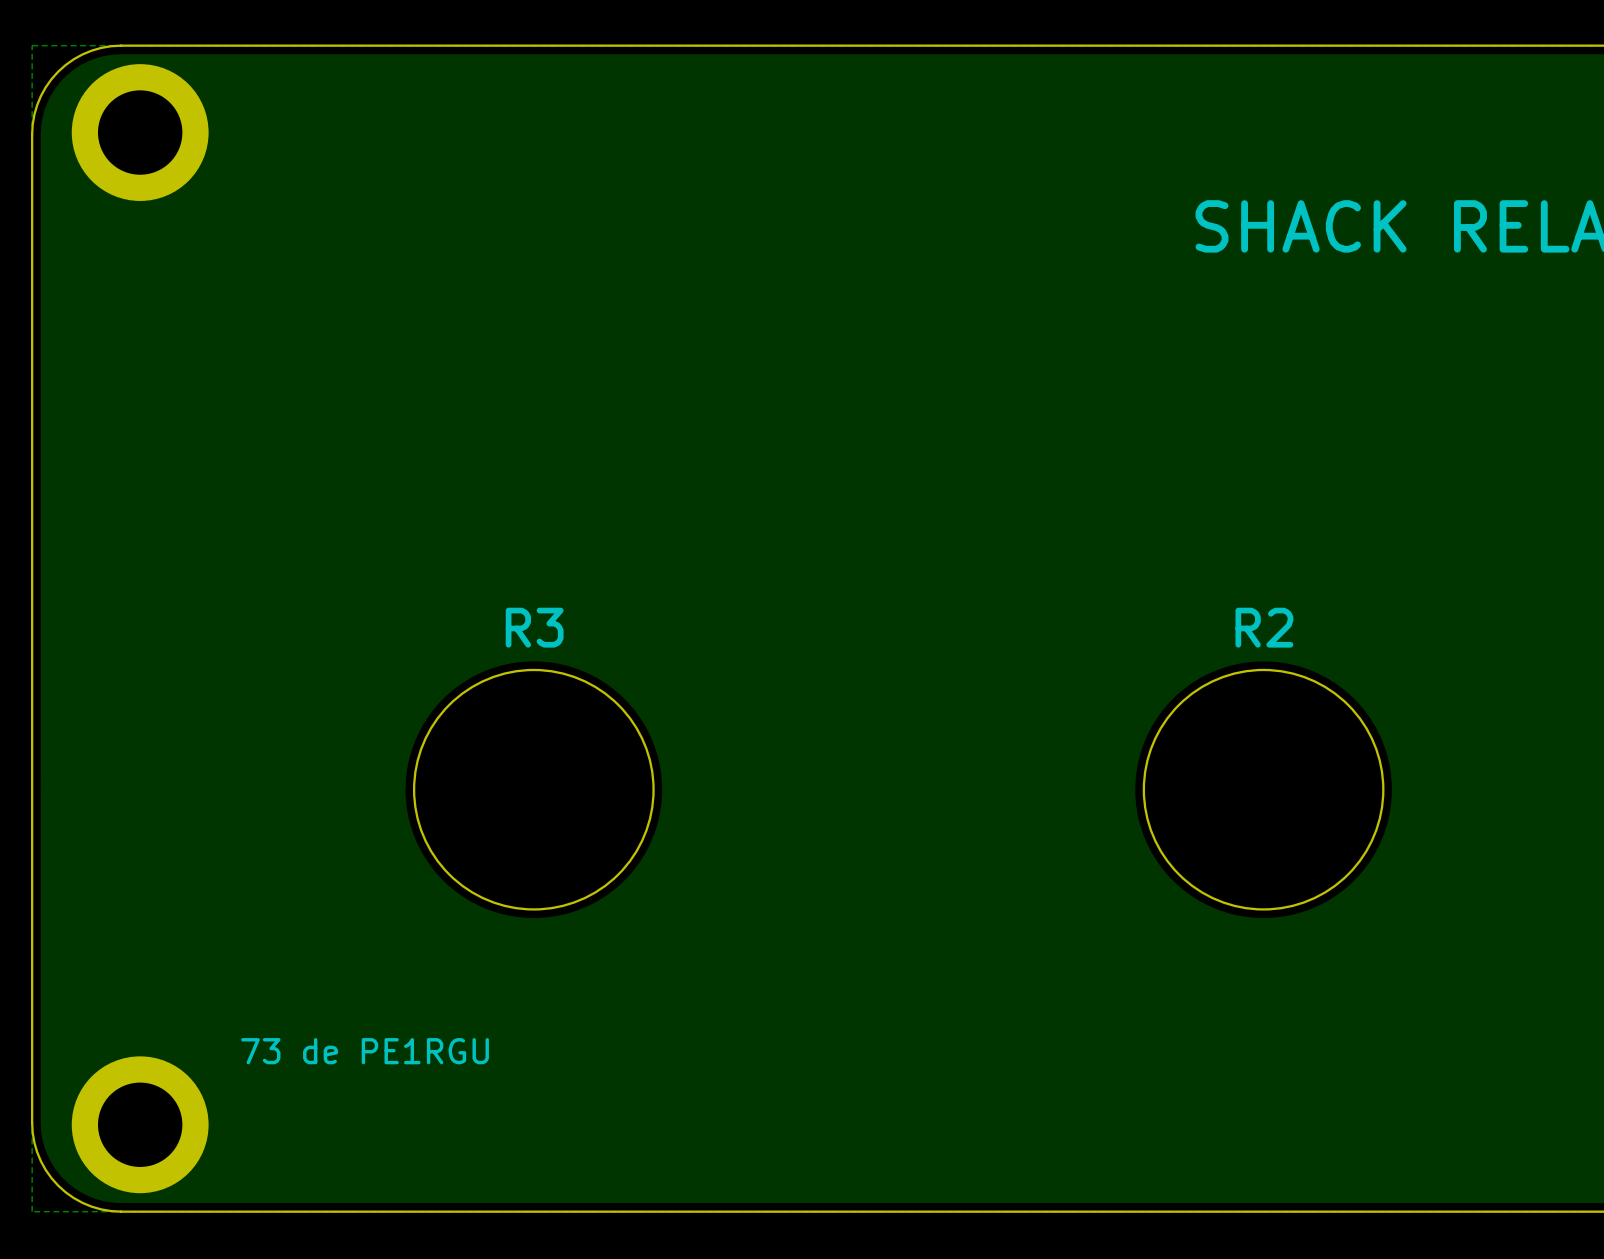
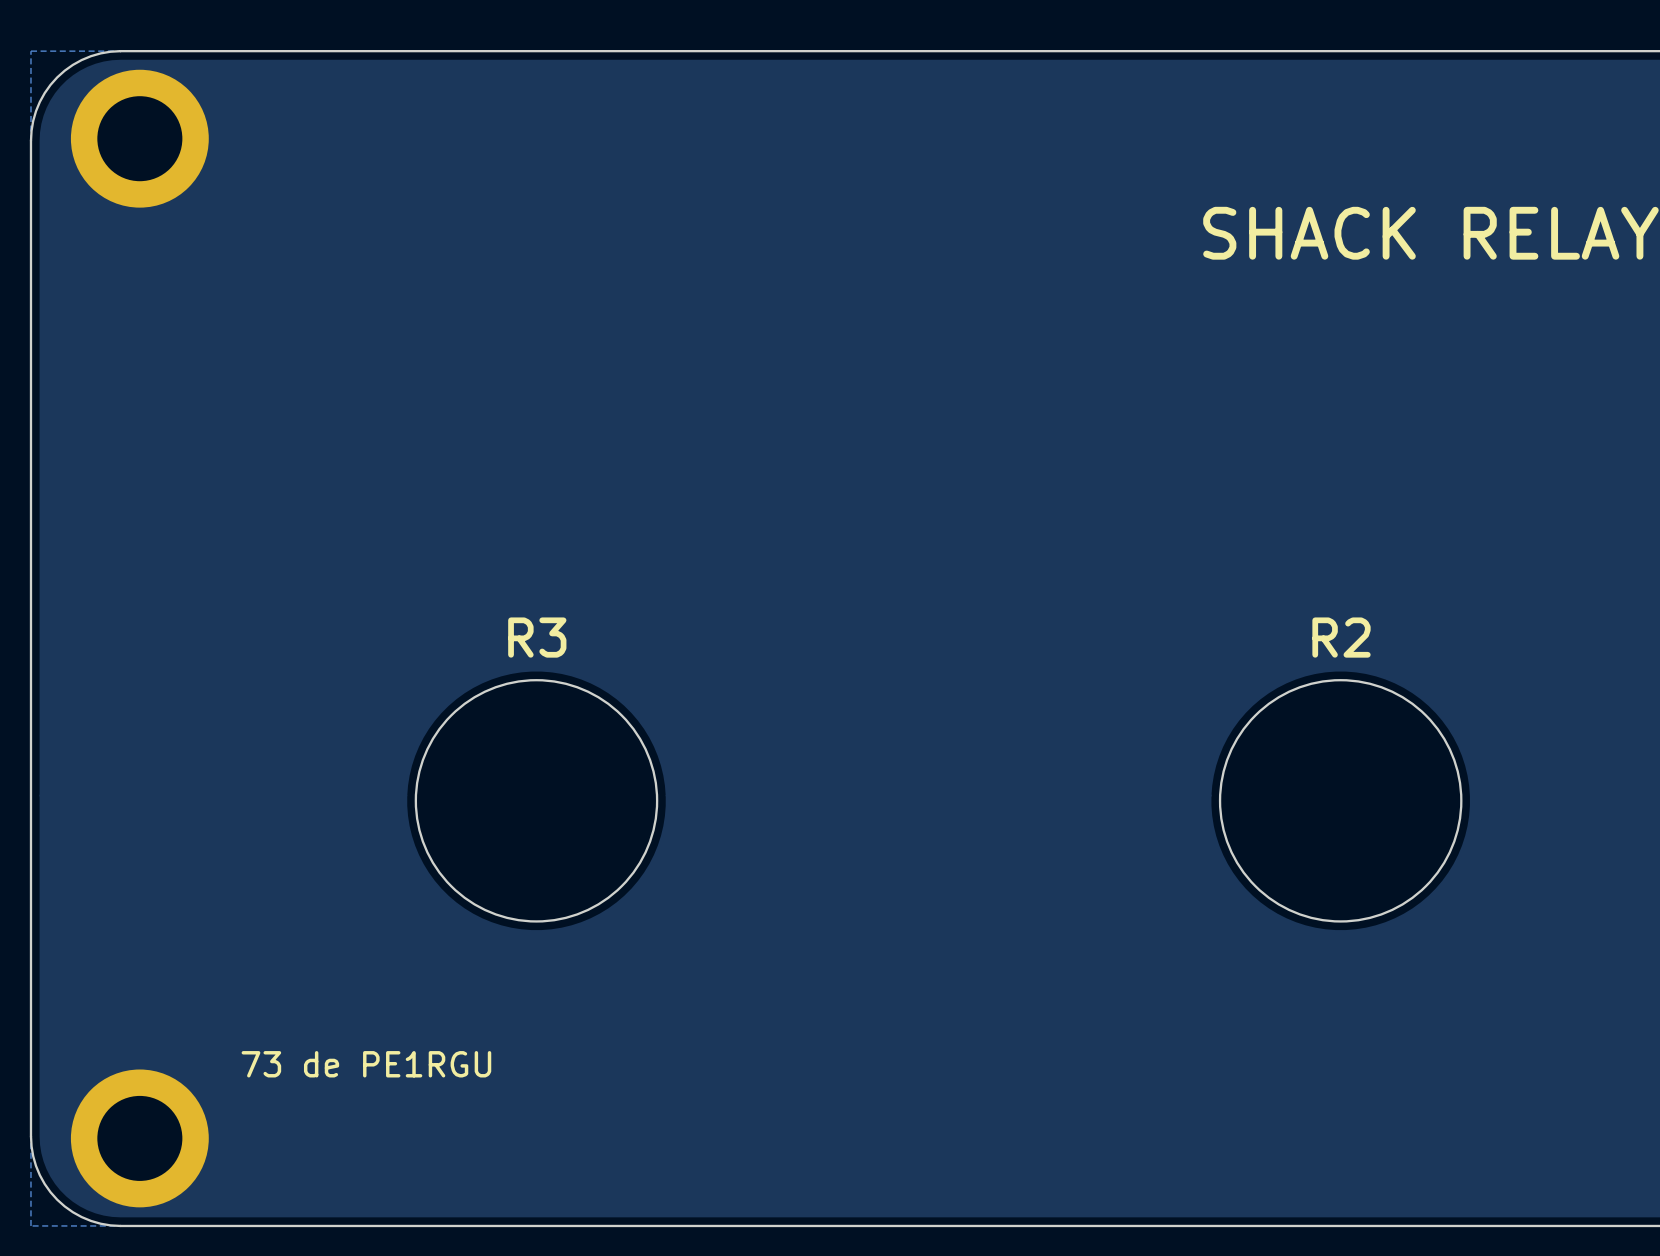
text position: R2 (1264, 627) -> R2 (1341, 637)
round board edge position: (1263, 789) -> (1340, 800)

